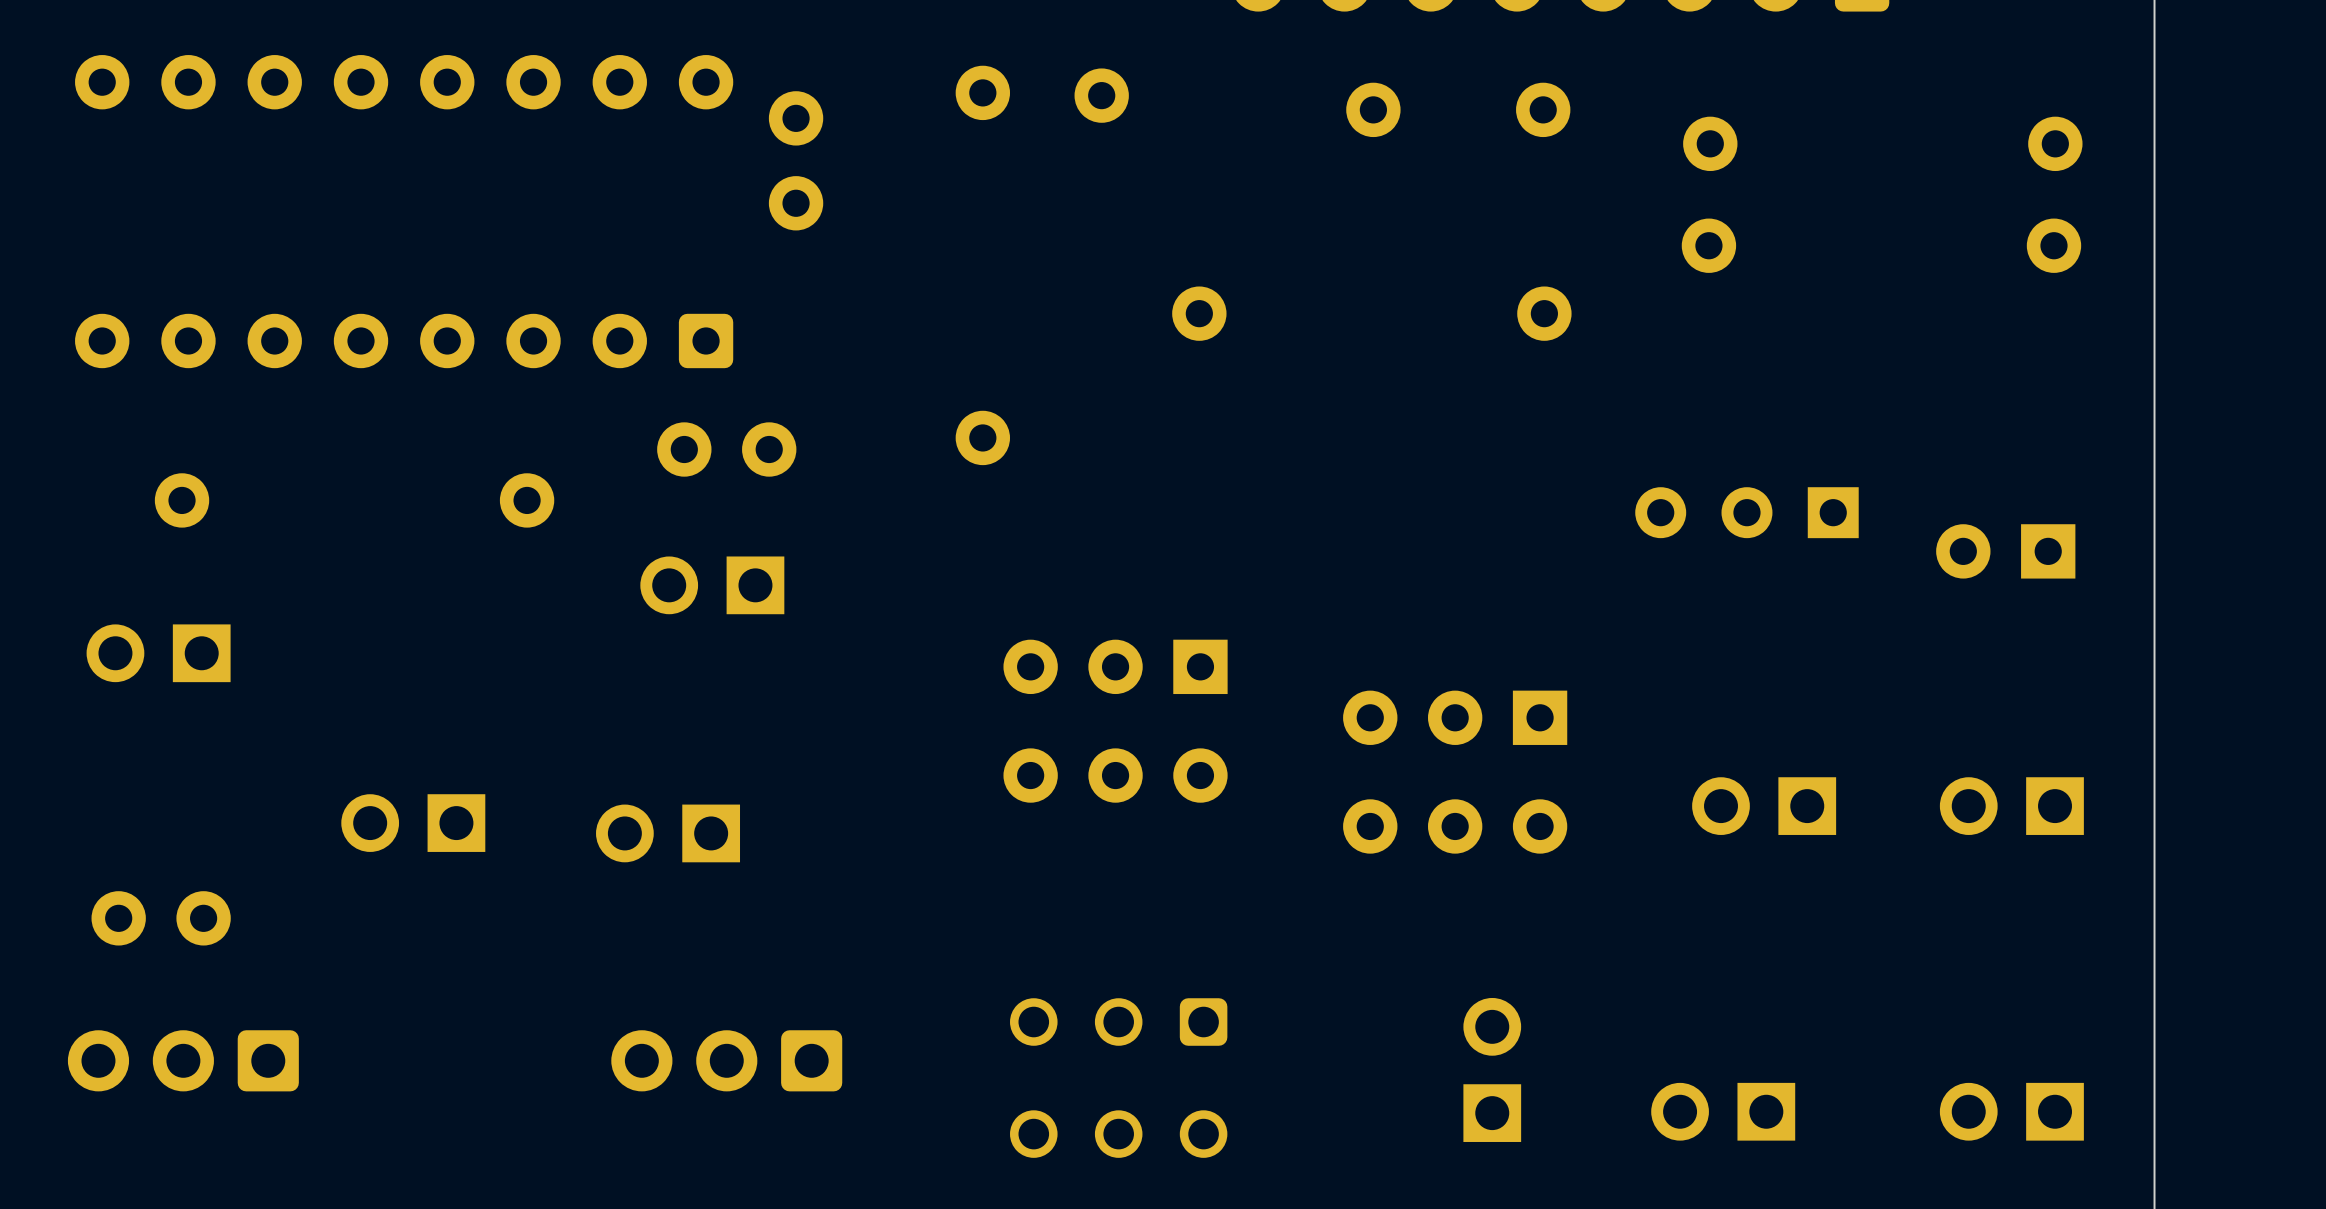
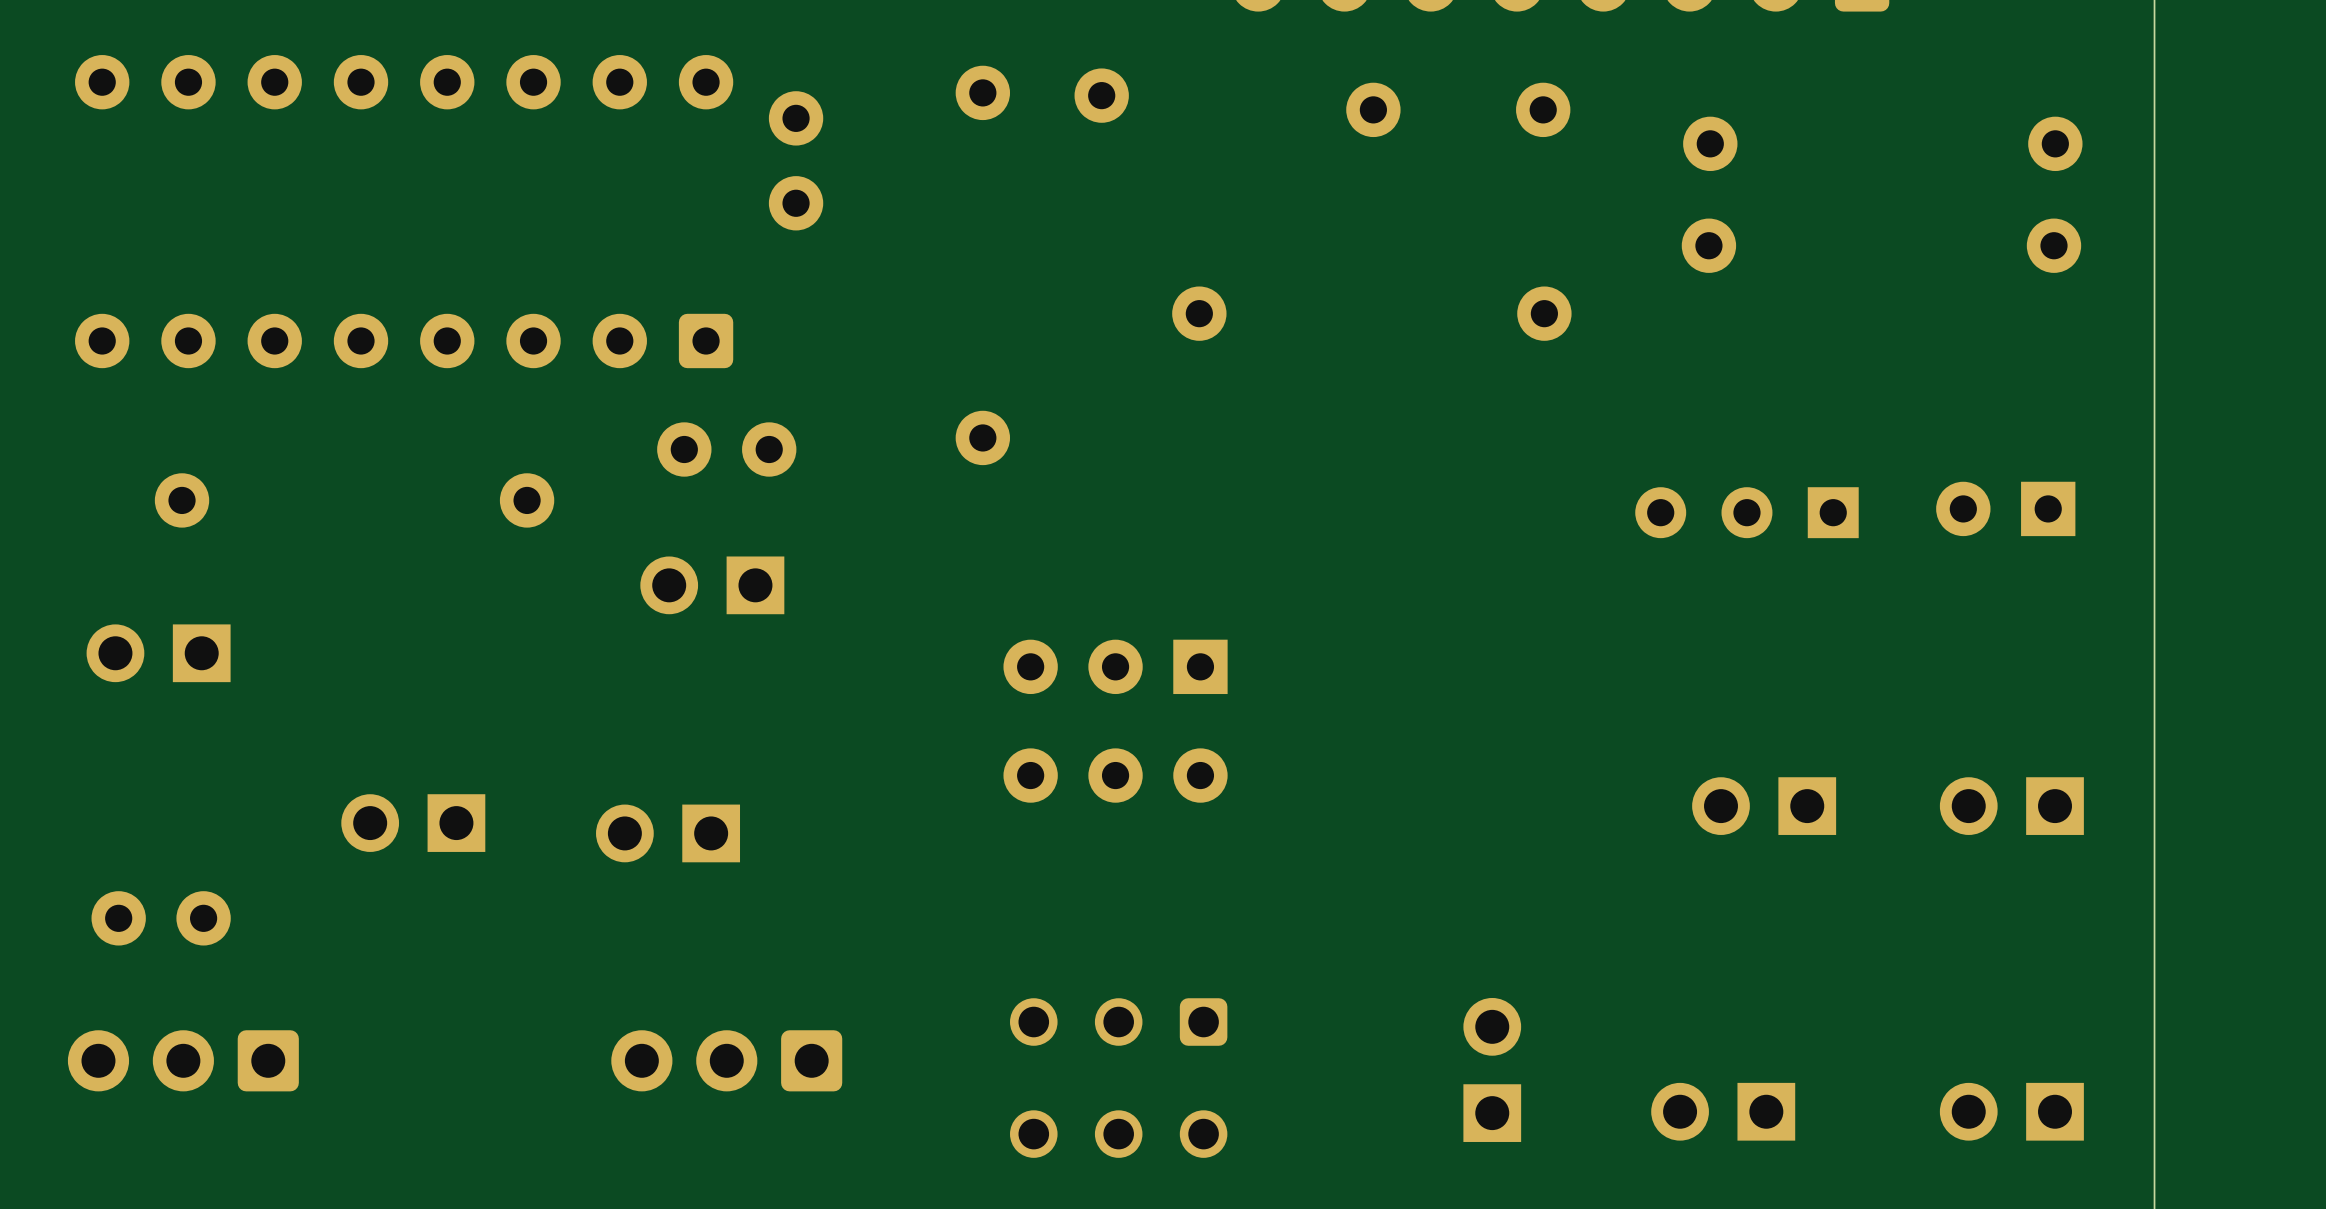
part position: (2005, 551) -> (2005, 508)
part: (1455, 772) -> none

